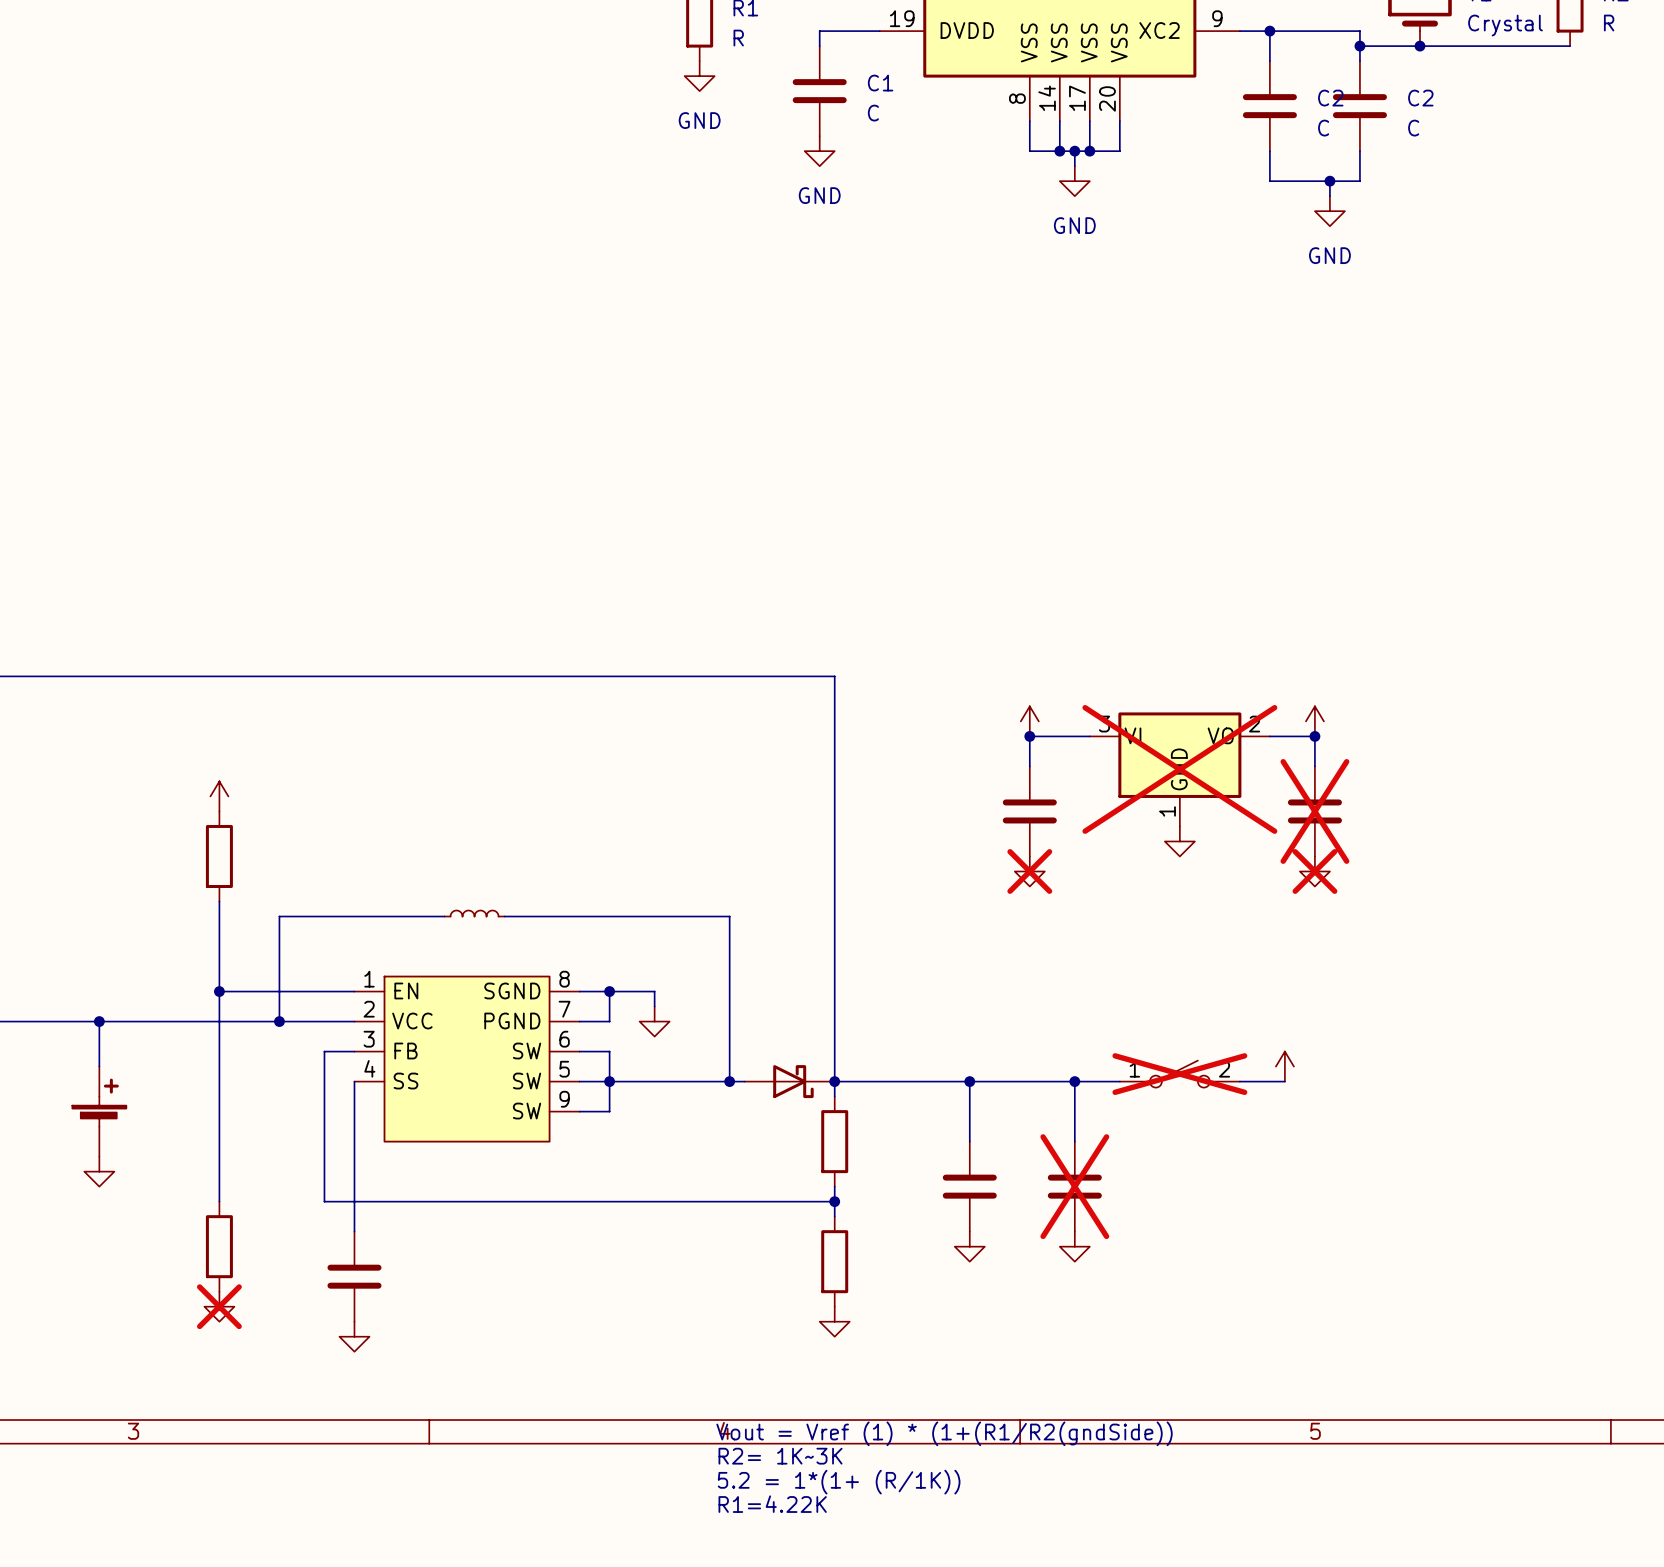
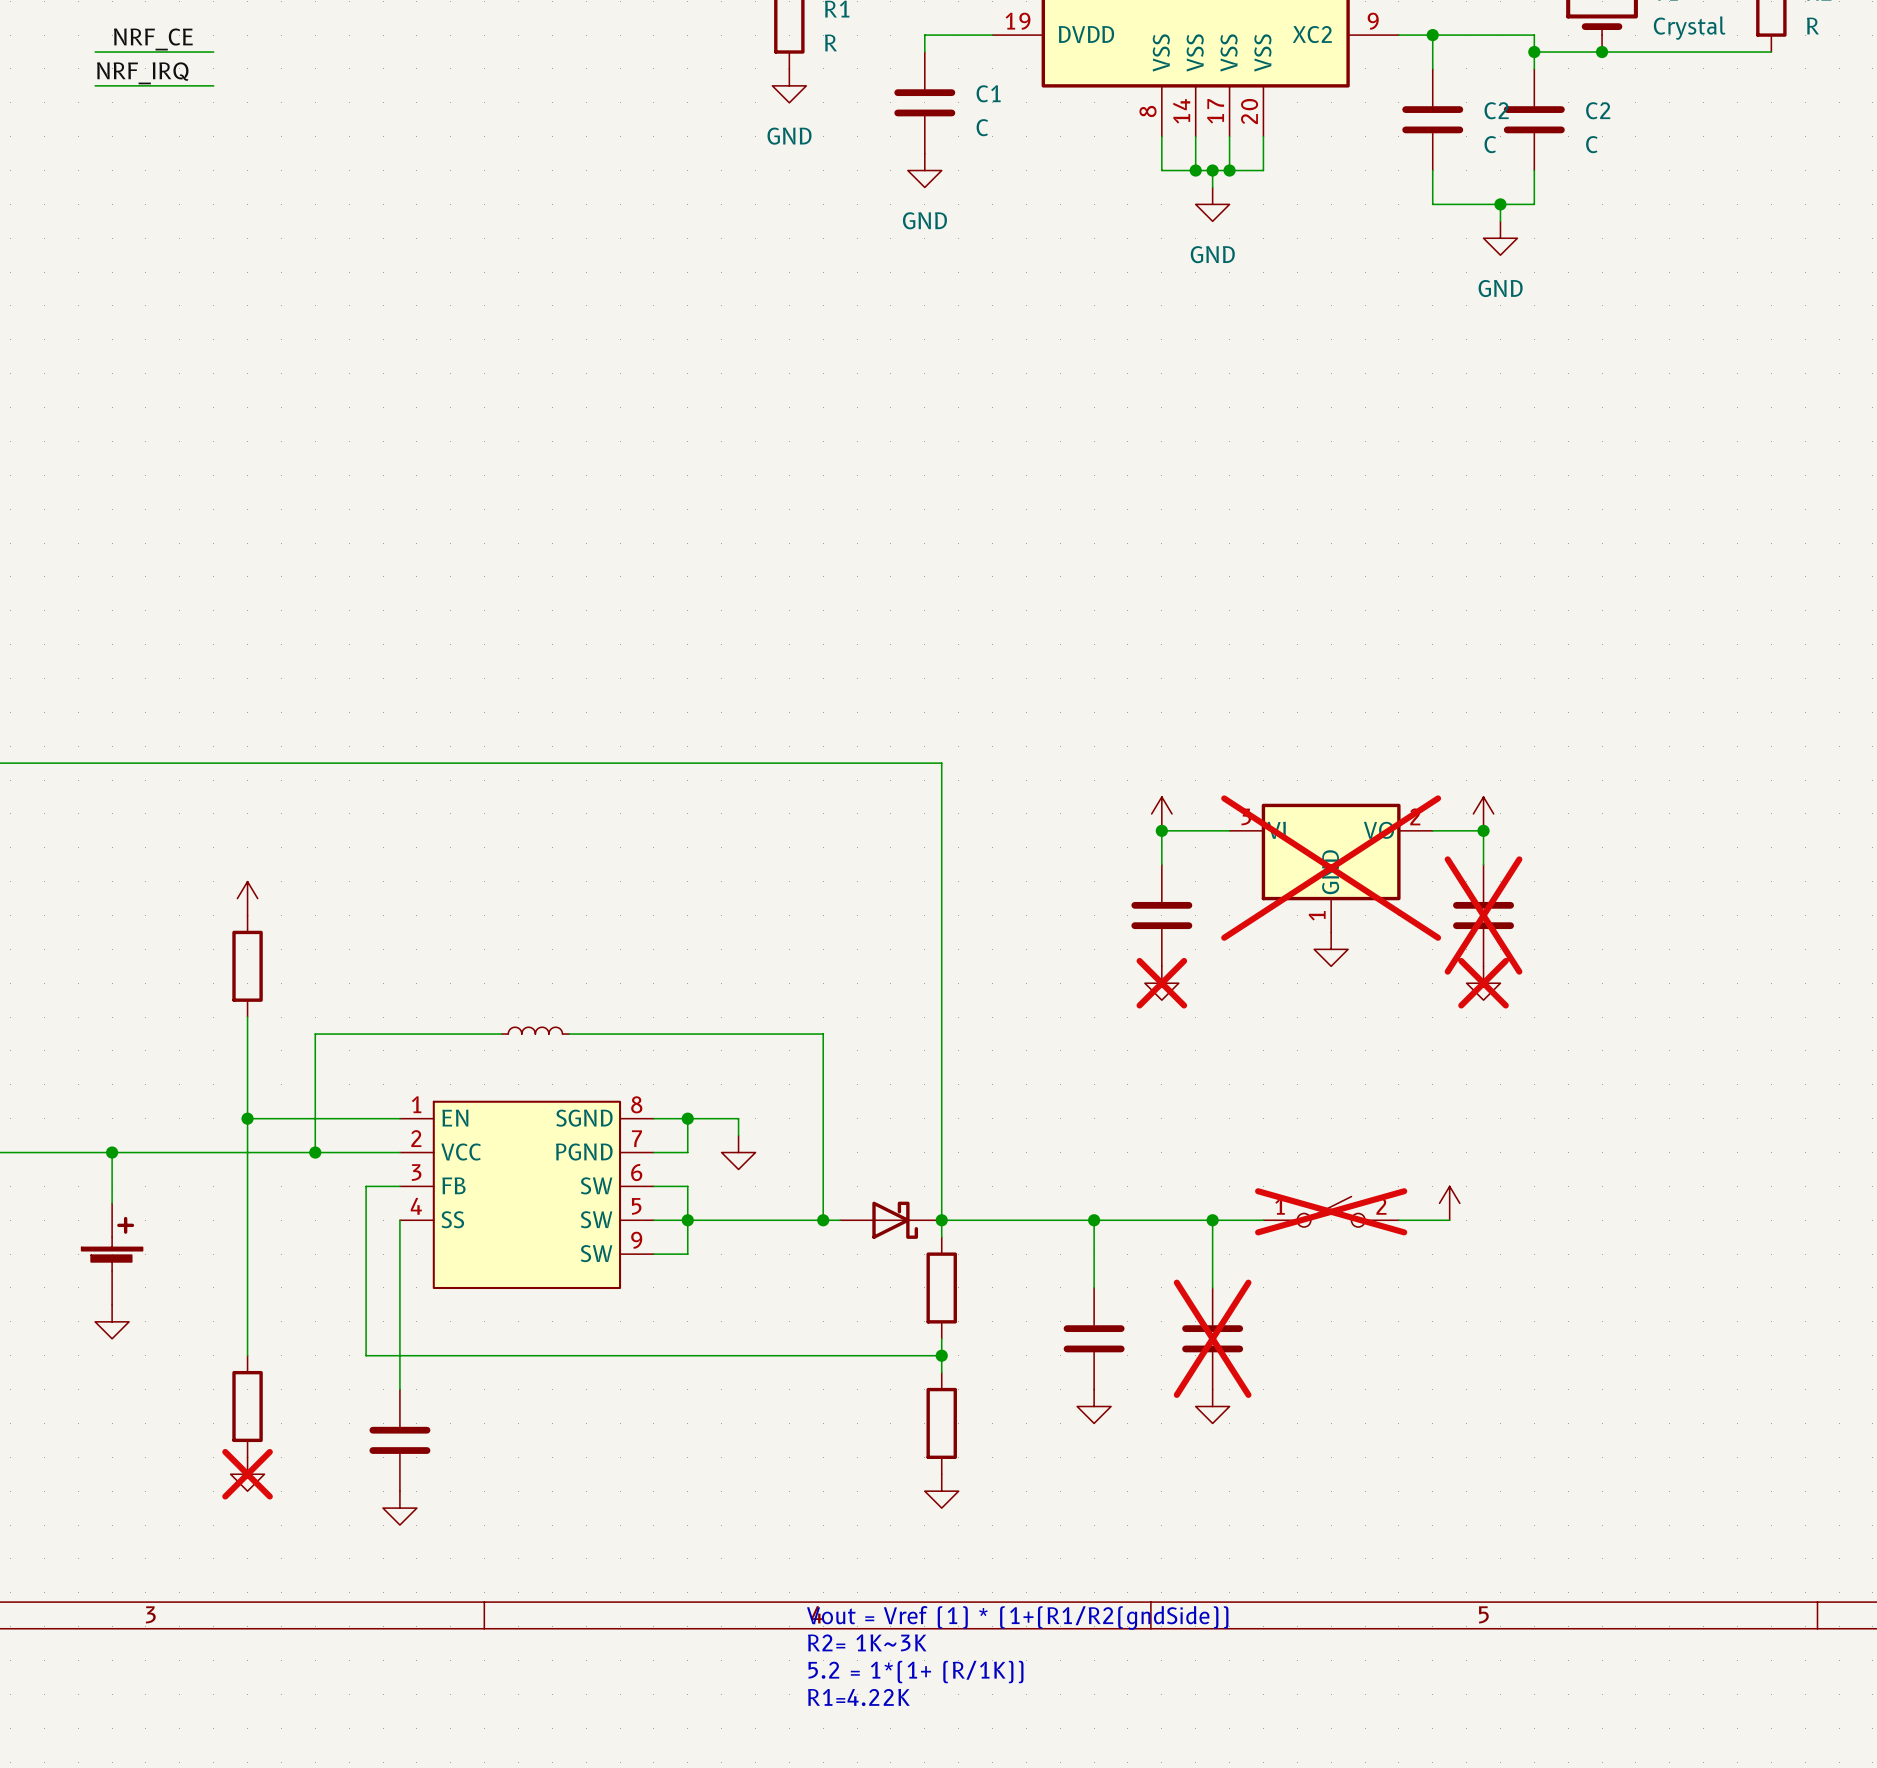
label: none -> NRF_CE (153, 39)
wire: none -> (95, 52) (213, 52)
label: none -> NRF_IRQ (142, 73)
wire: none -> (95, 85) (213, 85)

